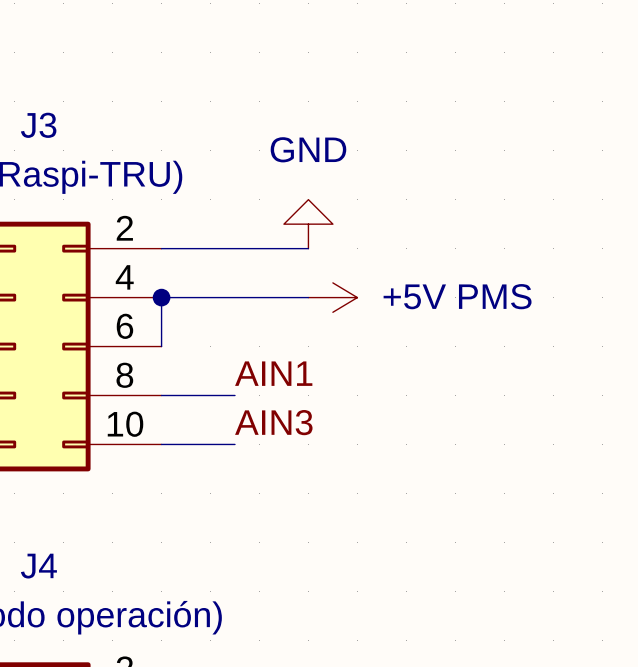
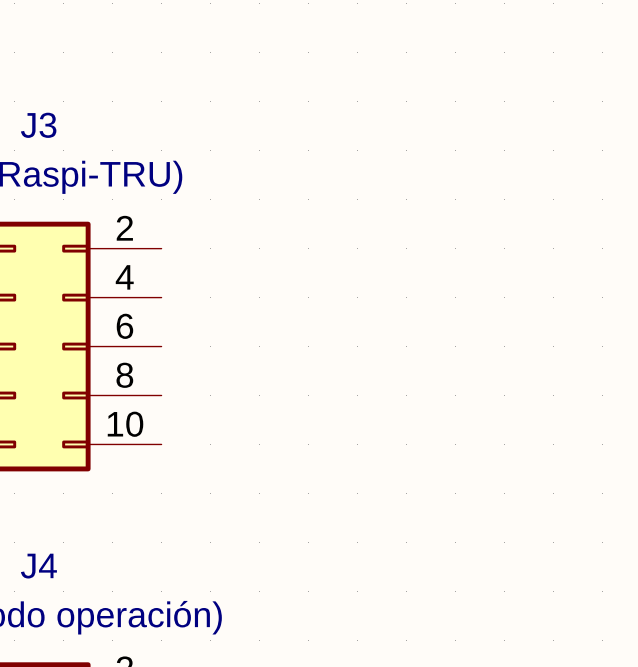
power symbol: GND (308, 224) -> none
wire: (161, 248) (308, 248) -> none
junction: (161, 297) -> none
wire: (308, 297) (161, 297) (161, 346) -> none
power symbol: +5V PMS (332, 297) -> none
label: AIN1 (273, 373) -> none
wire: (161, 395) (234, 395) -> none
label: AIN3 (273, 422) -> none
wire: (161, 444) (234, 444) -> none

